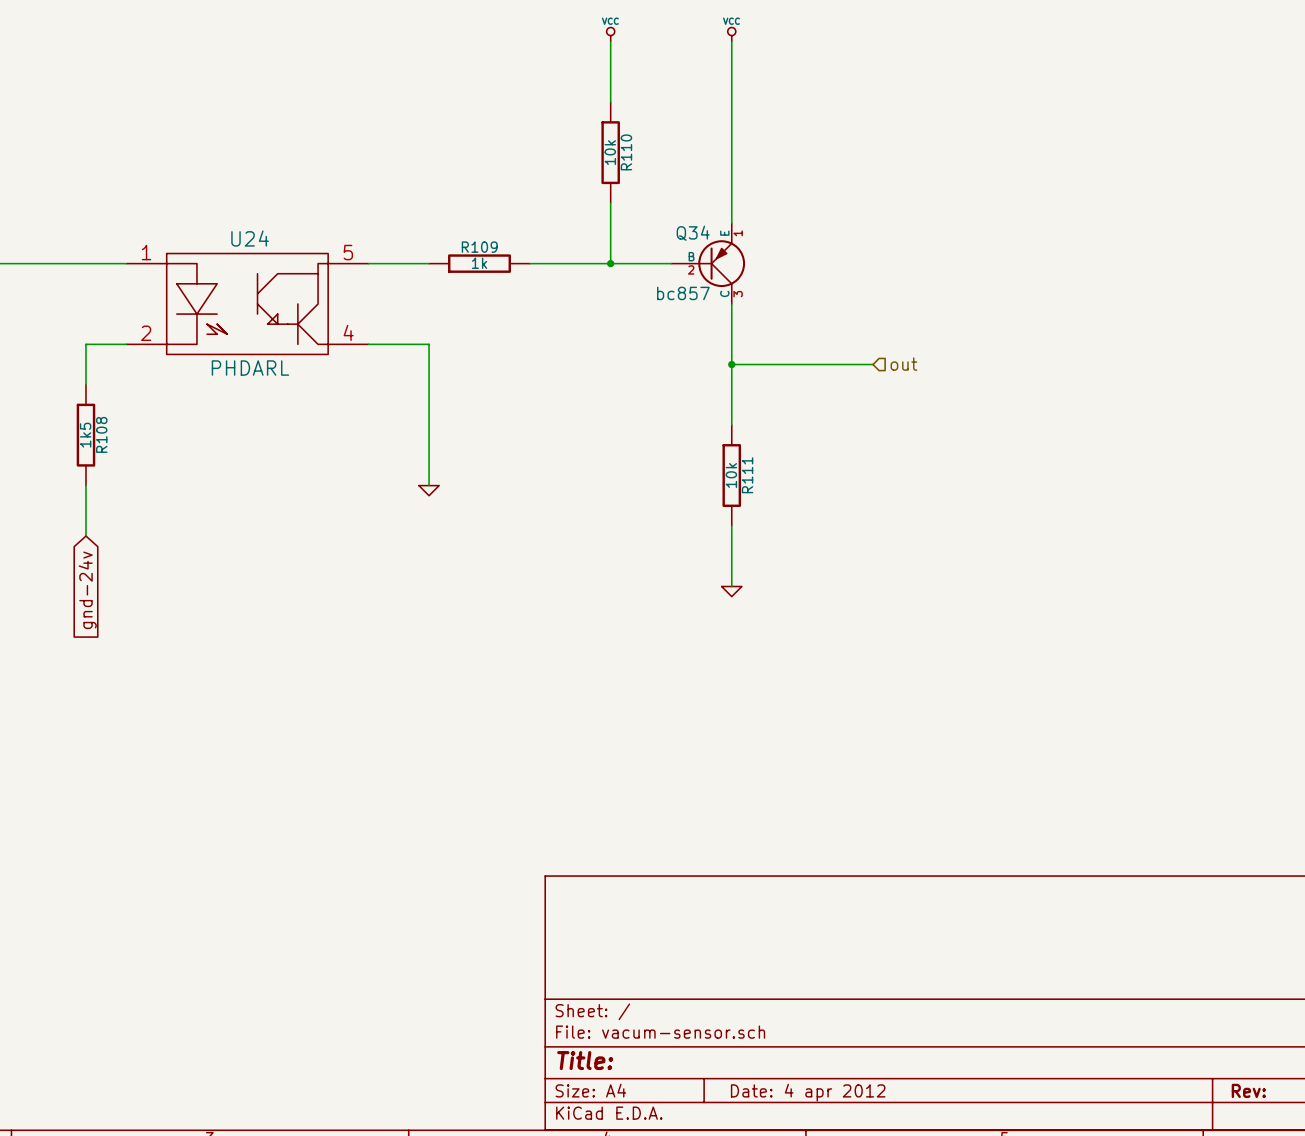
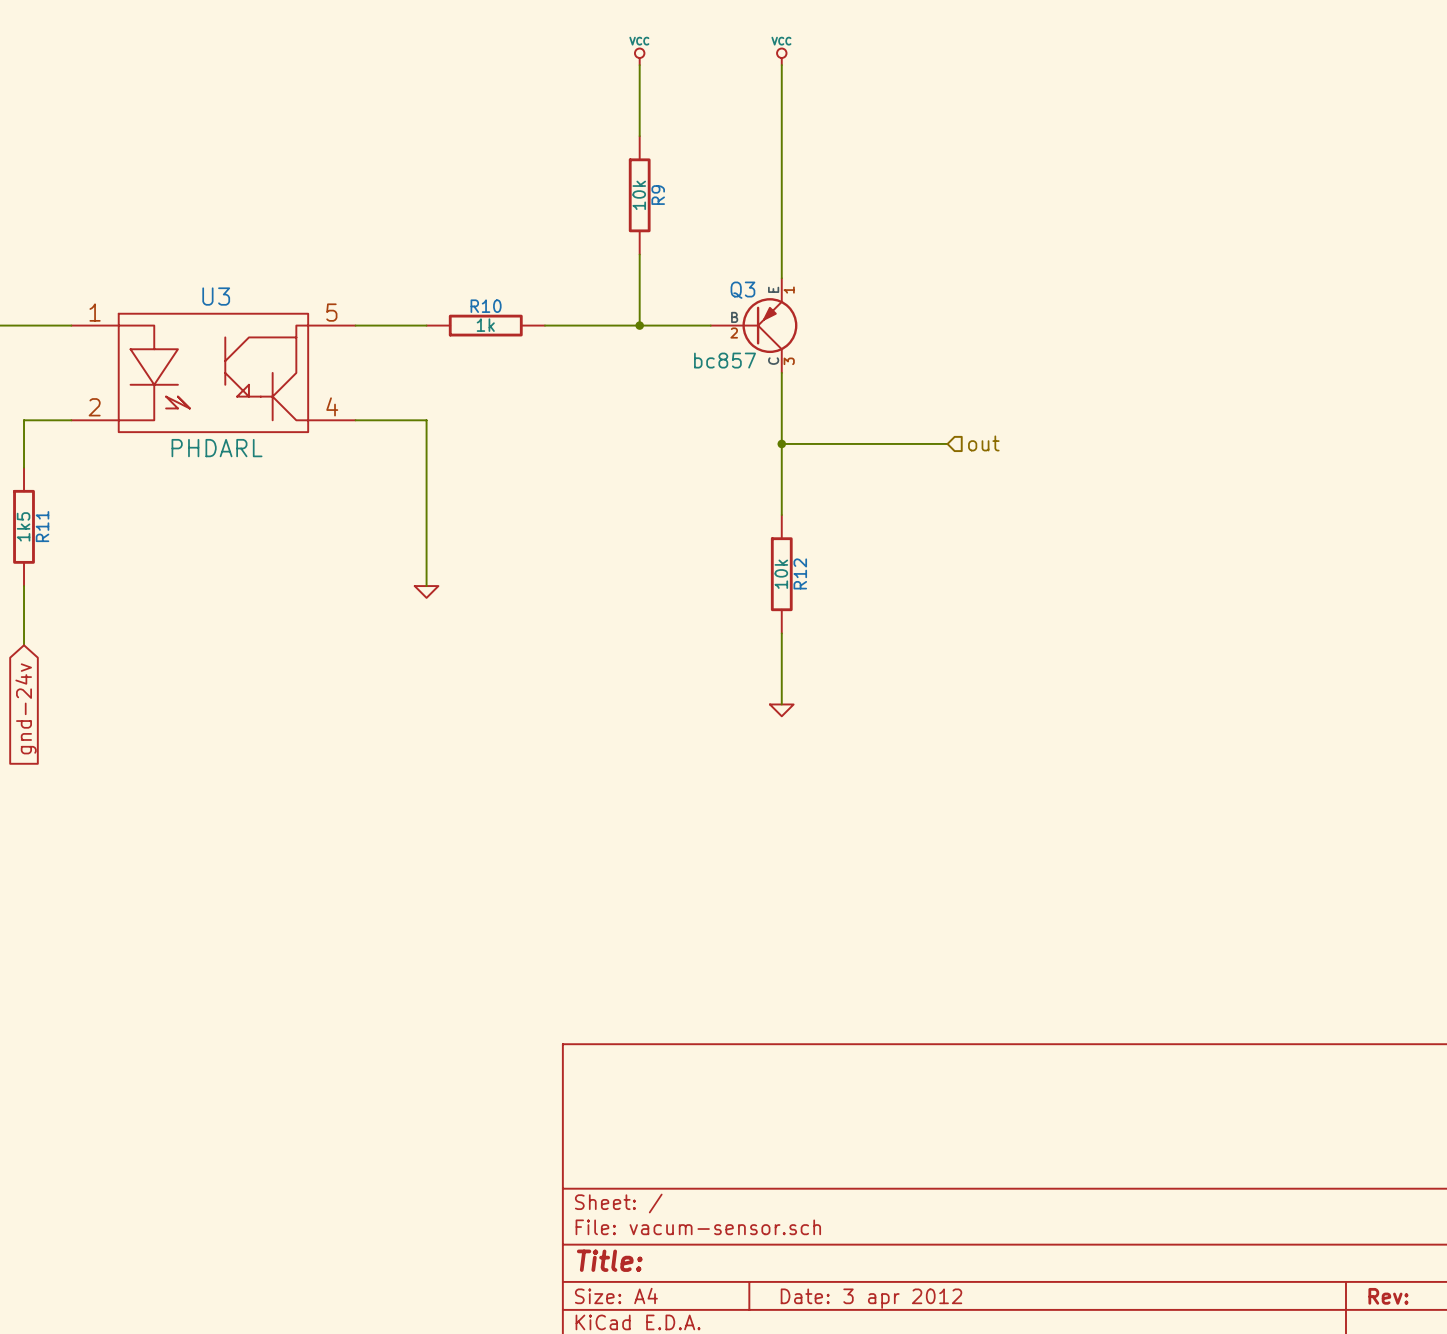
R110 name: R110 (626, 152) -> R9 (658, 195)
Q34 name: Q34 (693, 233) -> Q3 (742, 290)
U24 name: U24 (250, 238) -> U3 (216, 296)
R109 name: R109 (479, 247) -> R10 (486, 306)
R108 name: R108 (101, 434) -> R11 (42, 526)
R111 name: R111 (747, 475) -> R12 (800, 573)
title block: Date: 4 apr 2012 (808, 1092) -> Date: 3 apr 2012 (871, 1298)

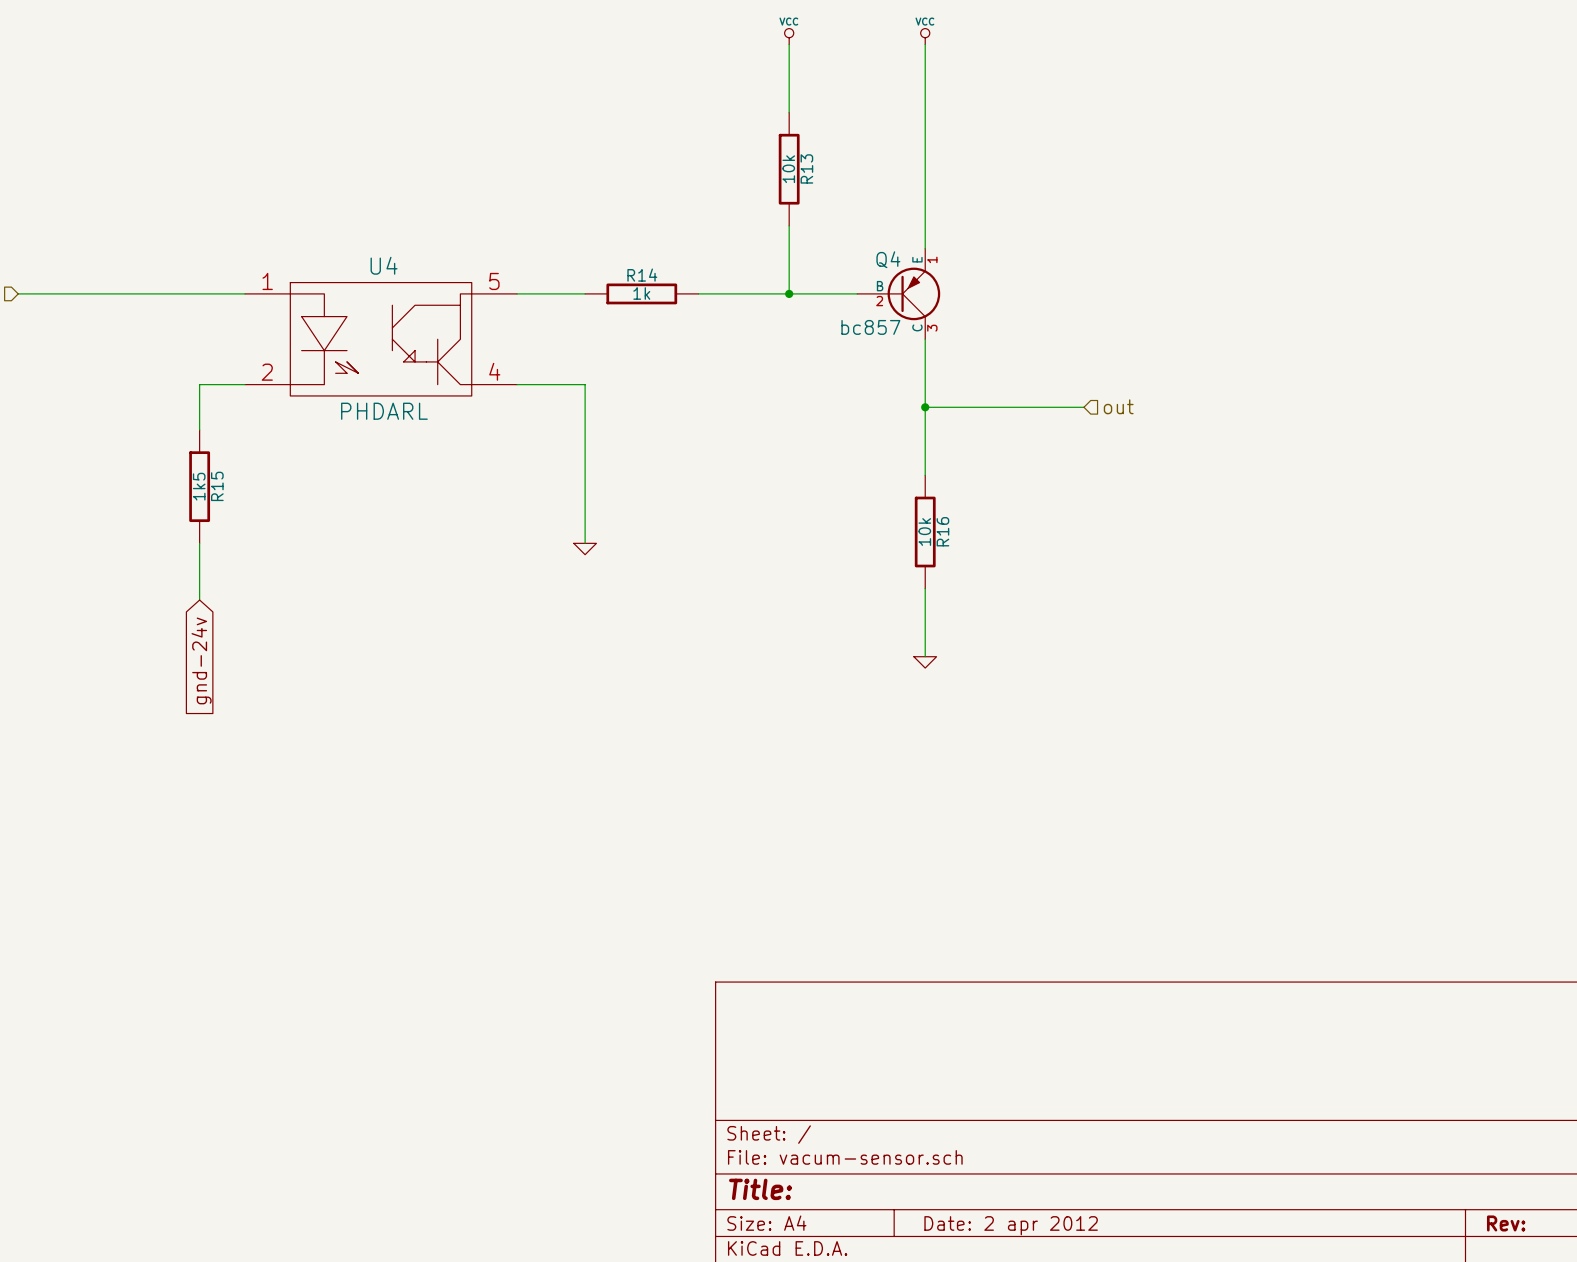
R9 name: R9 (658, 195) -> R13 (806, 168)
Q3 name: Q3 (742, 290) -> Q4 (888, 259)
U3 name: U3 (216, 296) -> U4 (384, 265)
R10 name: R10 (486, 306) -> R14 (642, 275)
R11 name: R11 (42, 526) -> R15 (217, 486)
R12 name: R12 (800, 573) -> R16 (942, 531)
title block: Date: 3 apr 2012 (871, 1298) -> Date: 2 apr 2012 (1011, 1225)

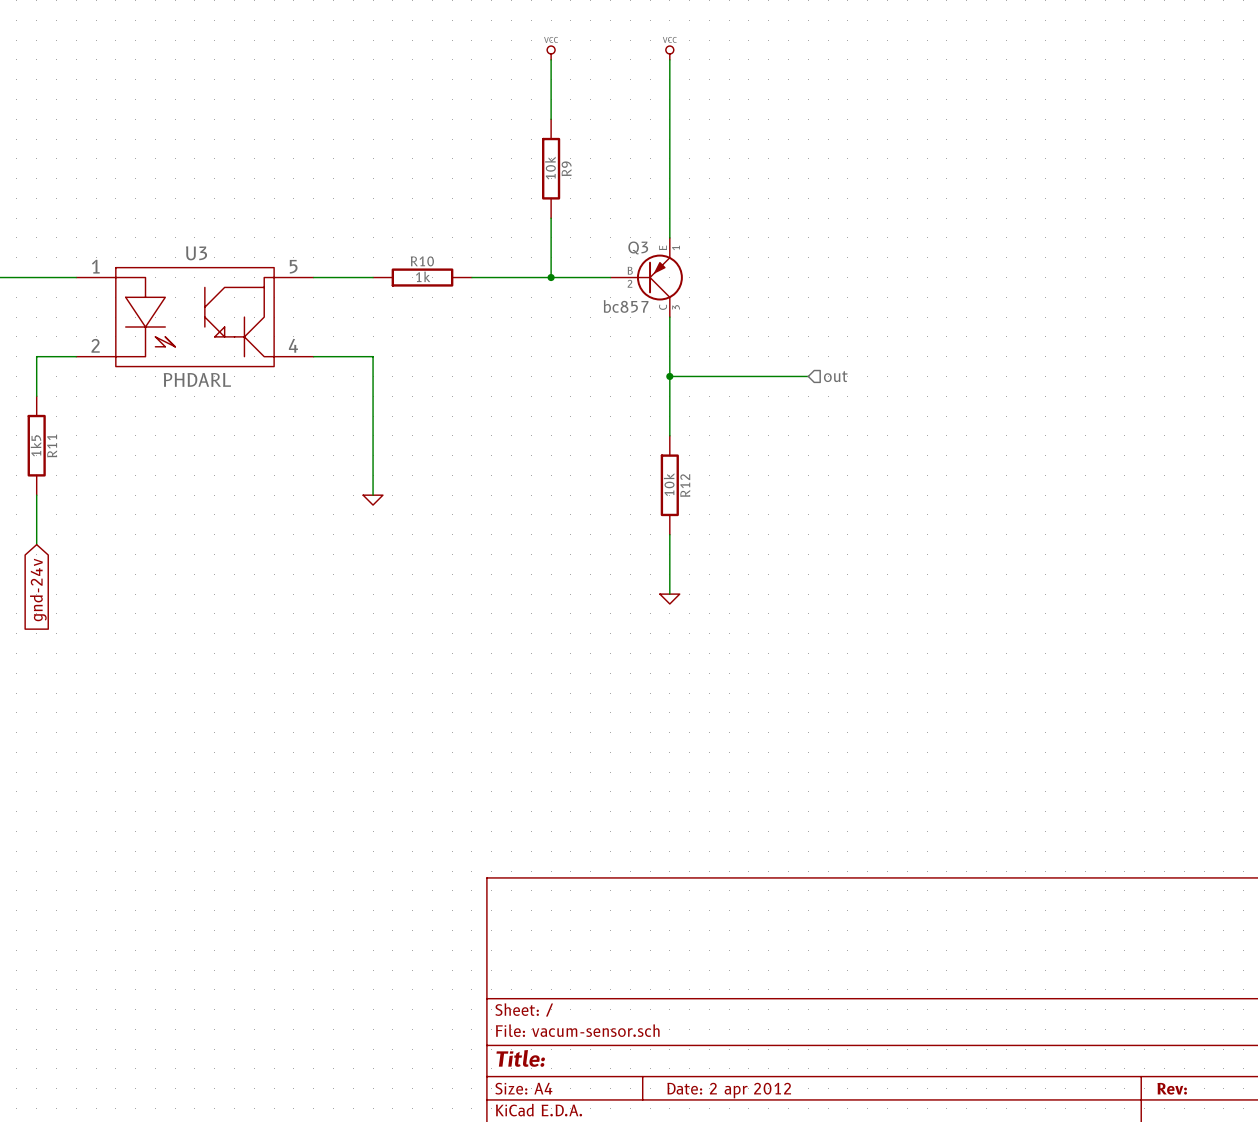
R13 name: R13 (806, 168) -> R9 (566, 168)
Q4 name: Q4 (888, 259) -> Q3 (638, 247)
U4 name: U4 (384, 265) -> U3 (196, 253)
R14 name: R14 (642, 275) -> R10 (422, 261)
R15 name: R15 (217, 486) -> R11 (52, 446)
R16 name: R16 (942, 531) -> R12 (685, 485)

